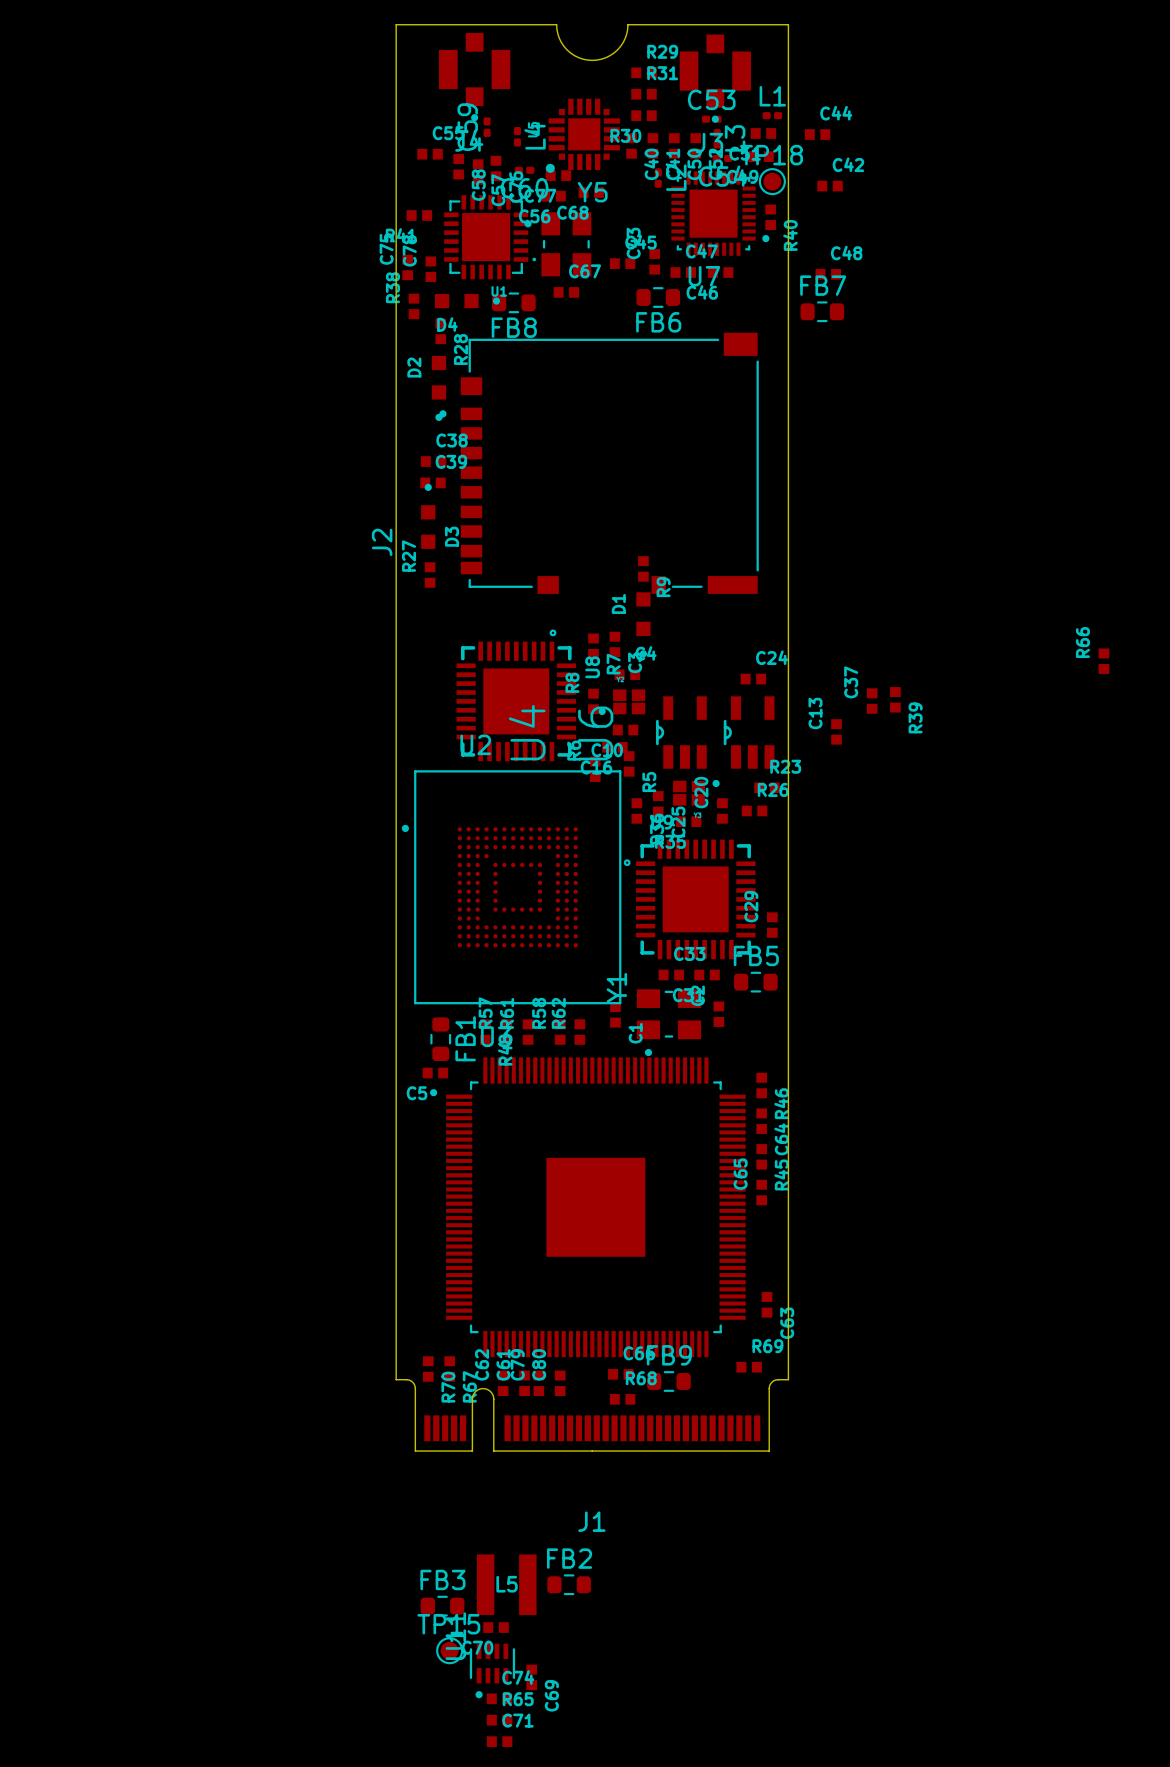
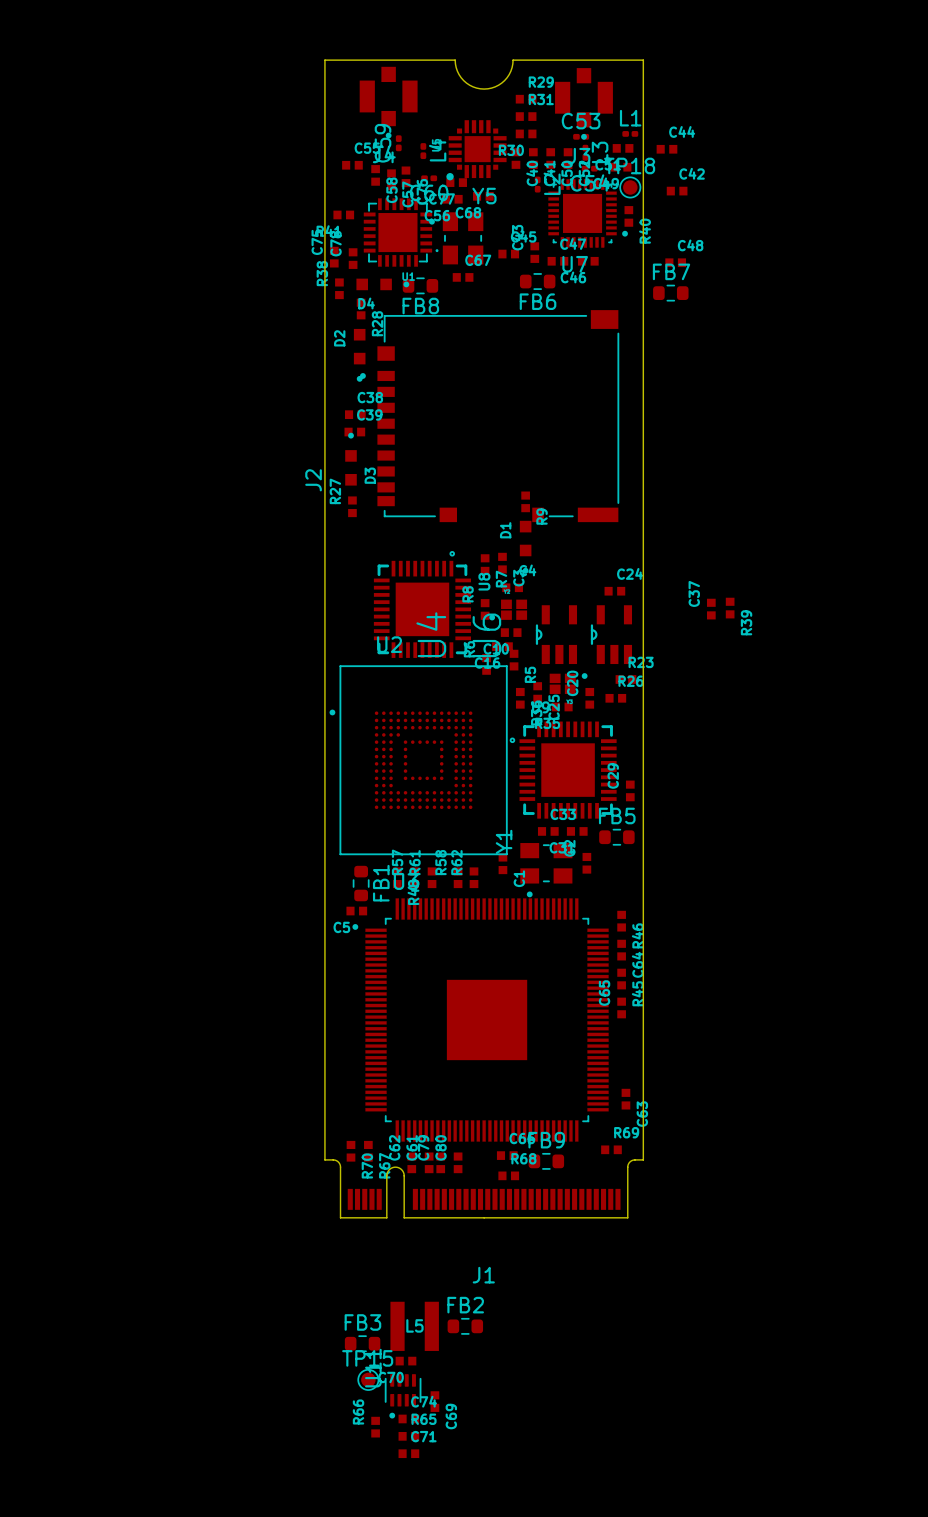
R66 position: (1103, 661) -> (375, 1427)
C13: (836, 731) -> none

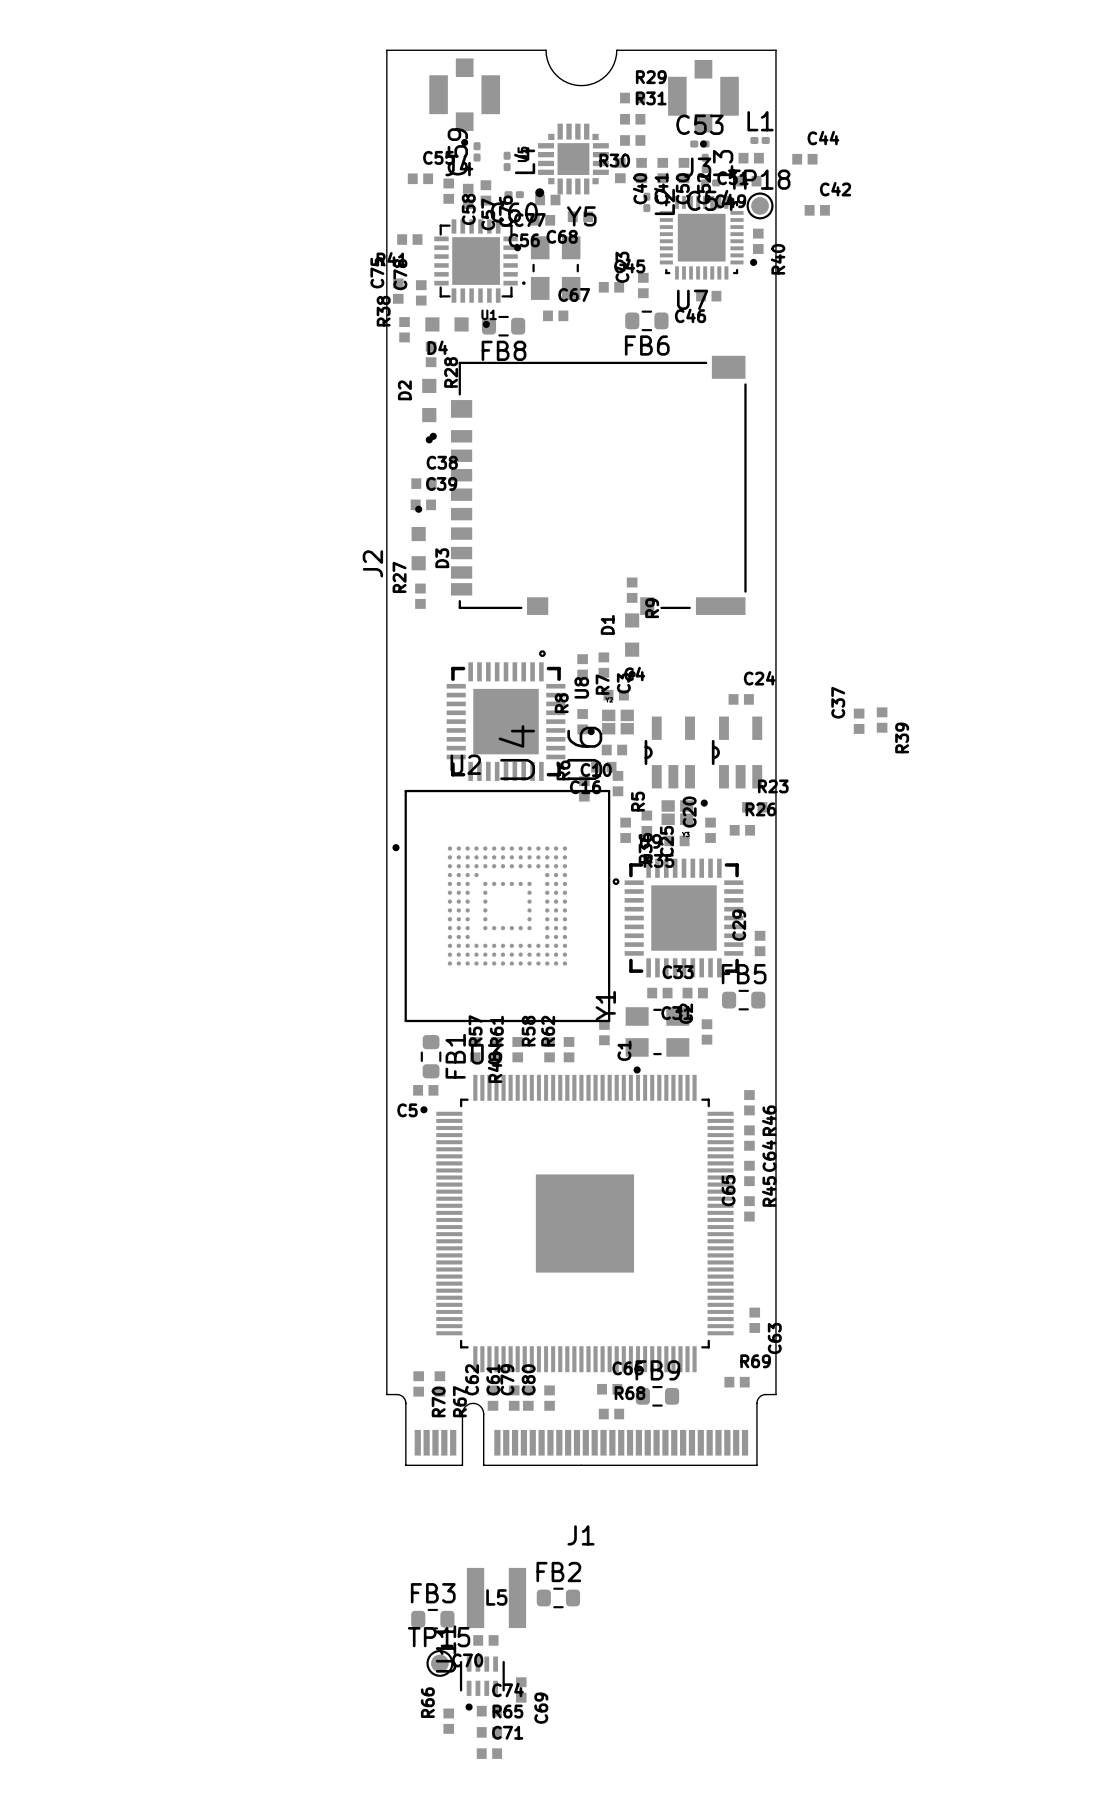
C47: (557, 261) -> none
C48: (675, 262) -> none
FB7: (670, 293) -> none

